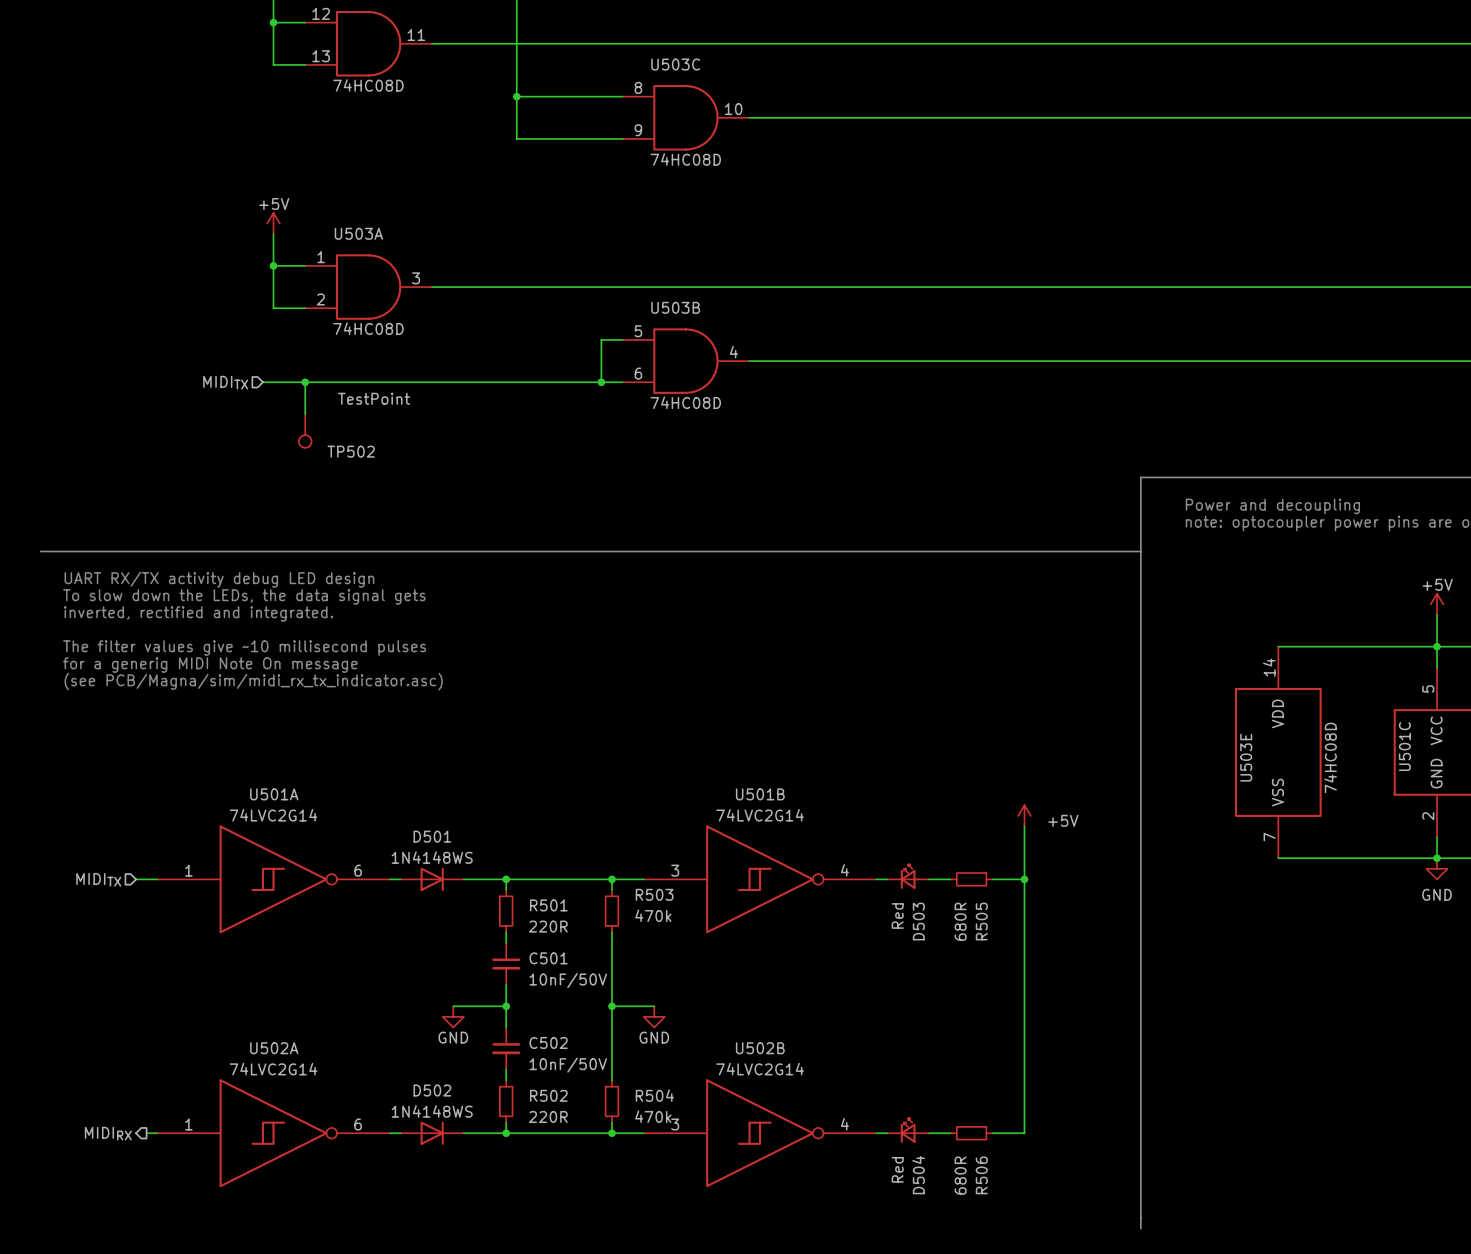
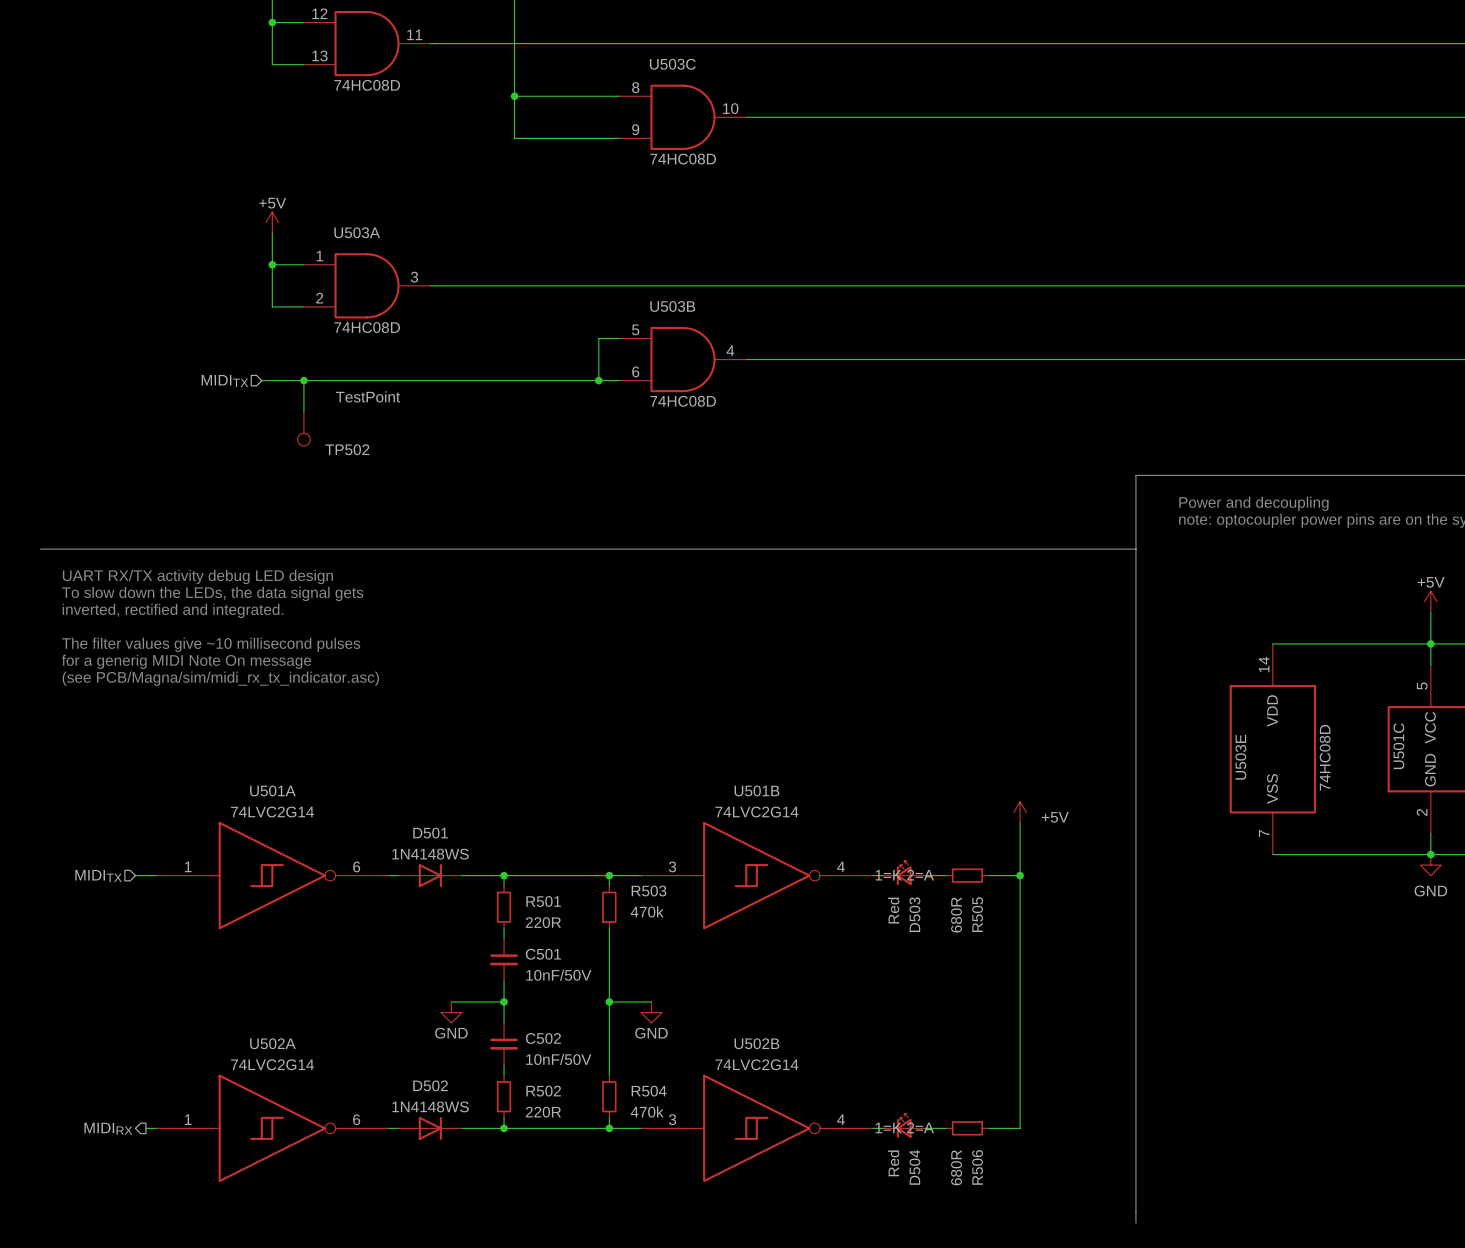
D503 text: none -> 1=K 2=A (904, 875)
D504 text: none -> 1=K 2=A (904, 1127)

